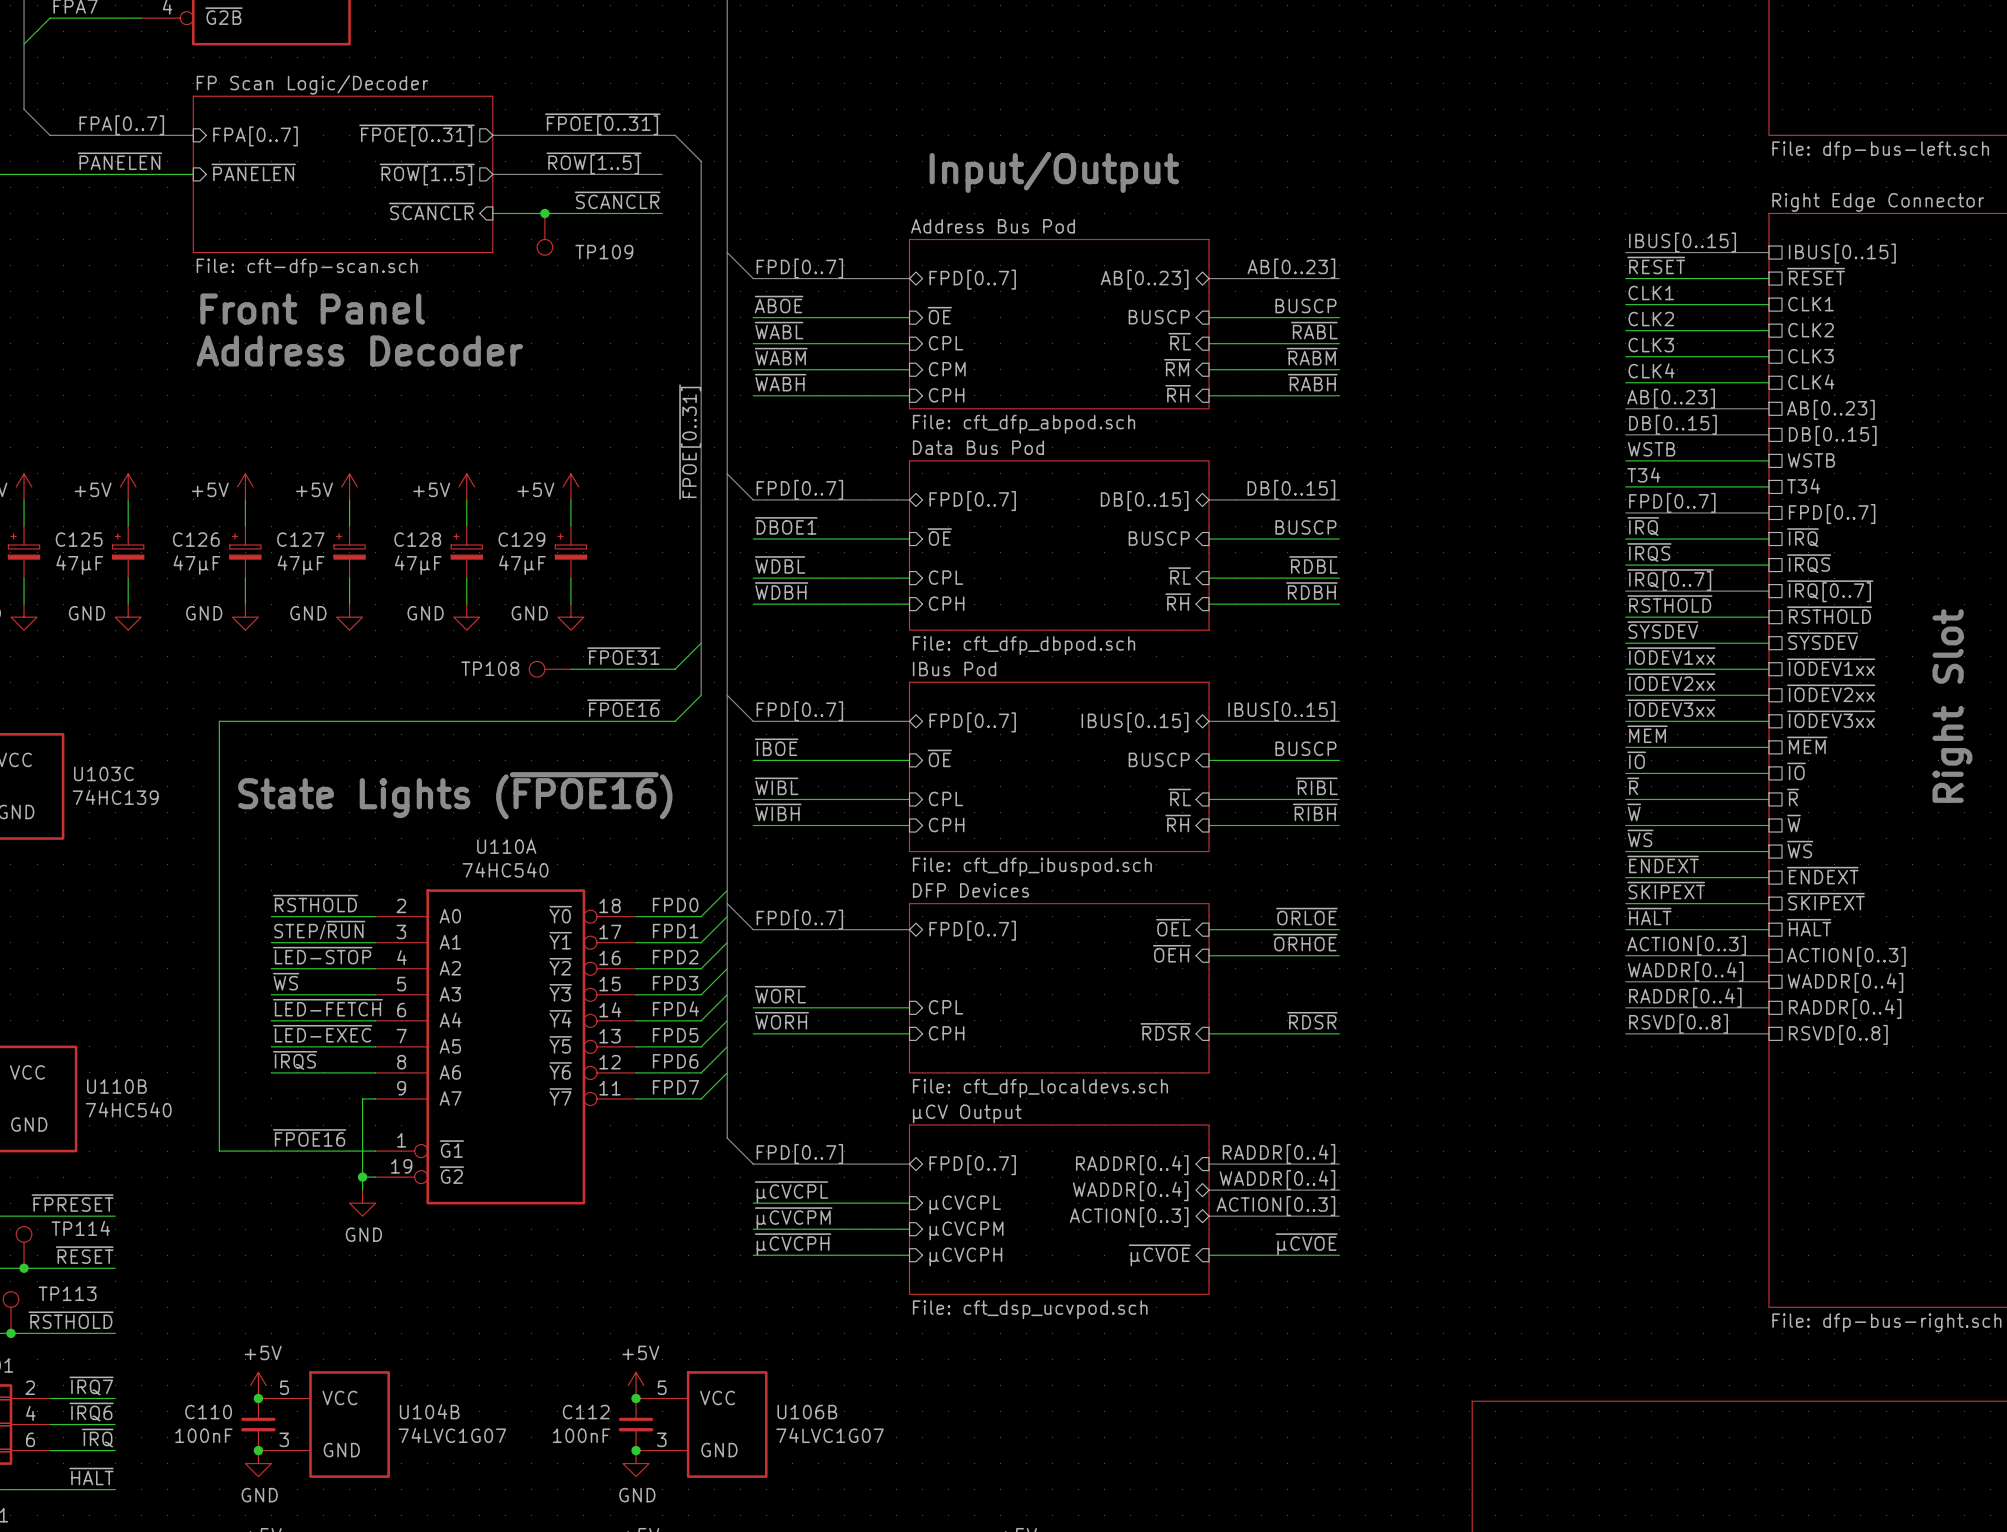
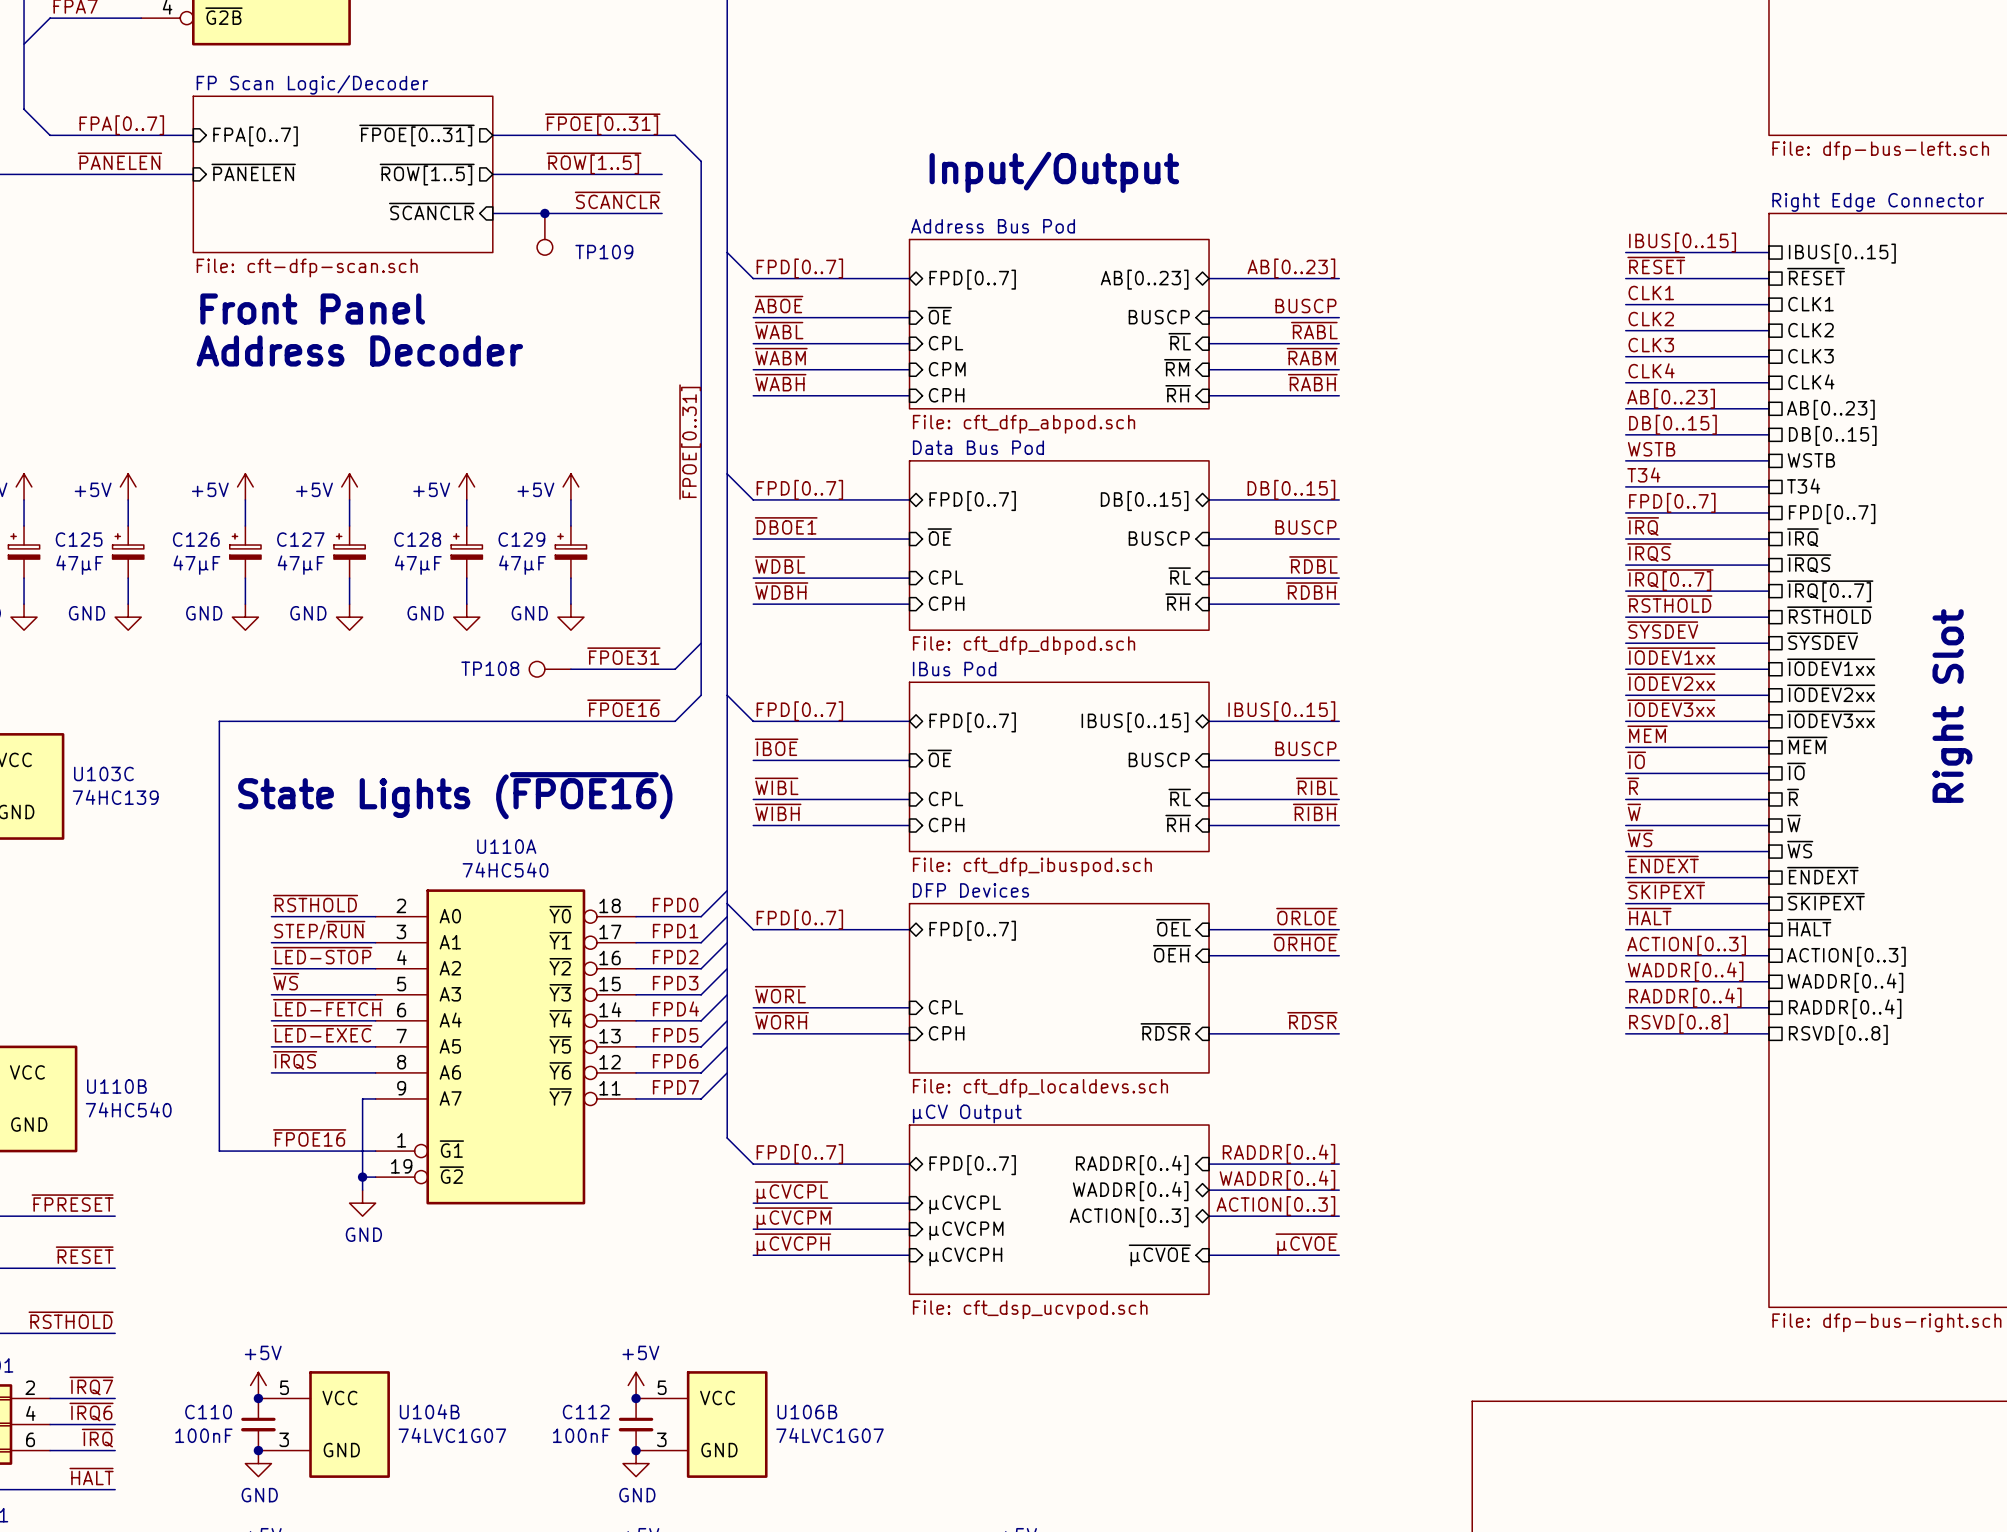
TP114: (24, 1247) -> none
junction: (24, 1268) -> none
TP113: (10, 1312) -> none
junction: (10, 1333) -> none

